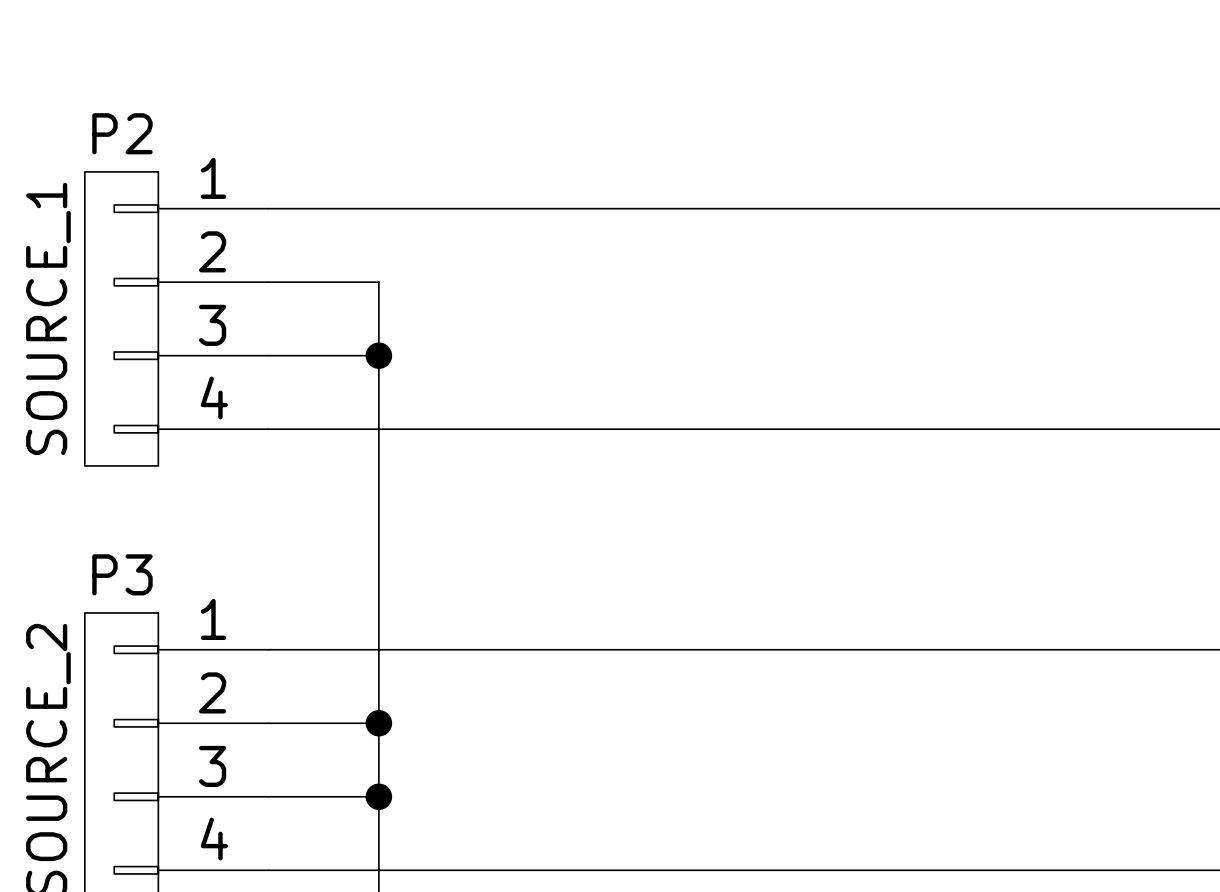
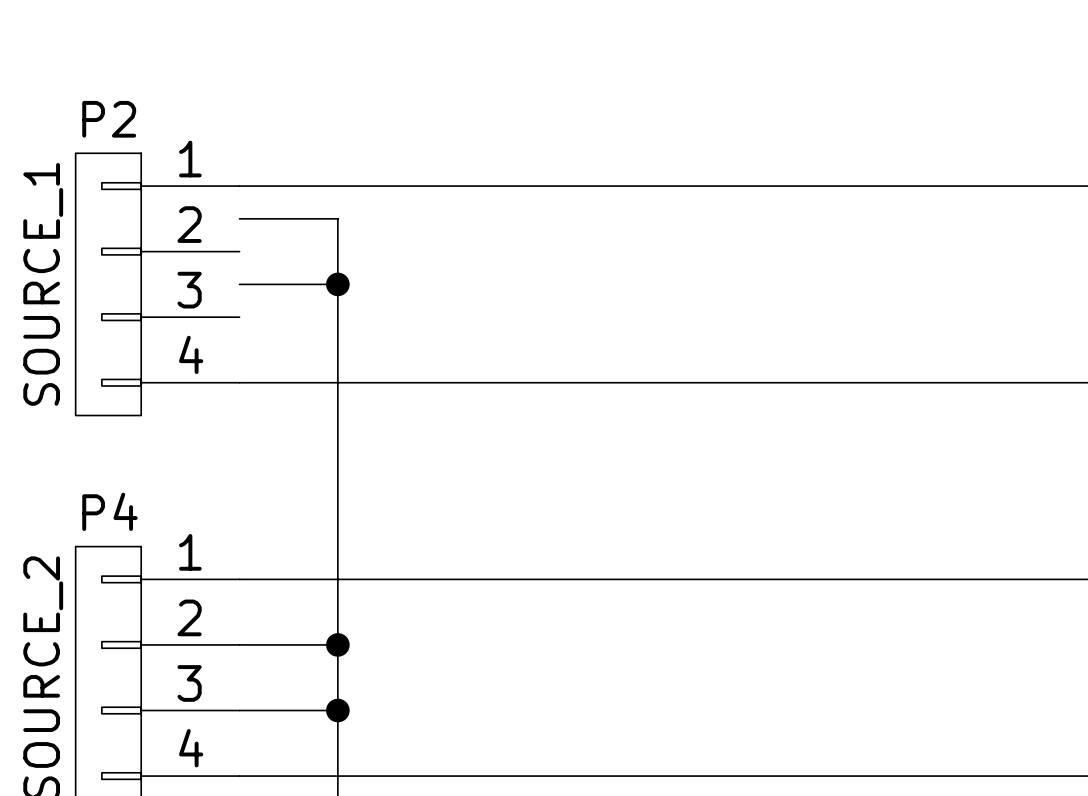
wire: (268, 282) (378, 282) -> (239, 218) (337, 218) (337, 251)
wire: (268, 355) (378, 355) -> (239, 284) (337, 284)
junction position: (378, 355) -> (337, 284)
P3 name: P3 (122, 574) -> P4 (109, 511)

